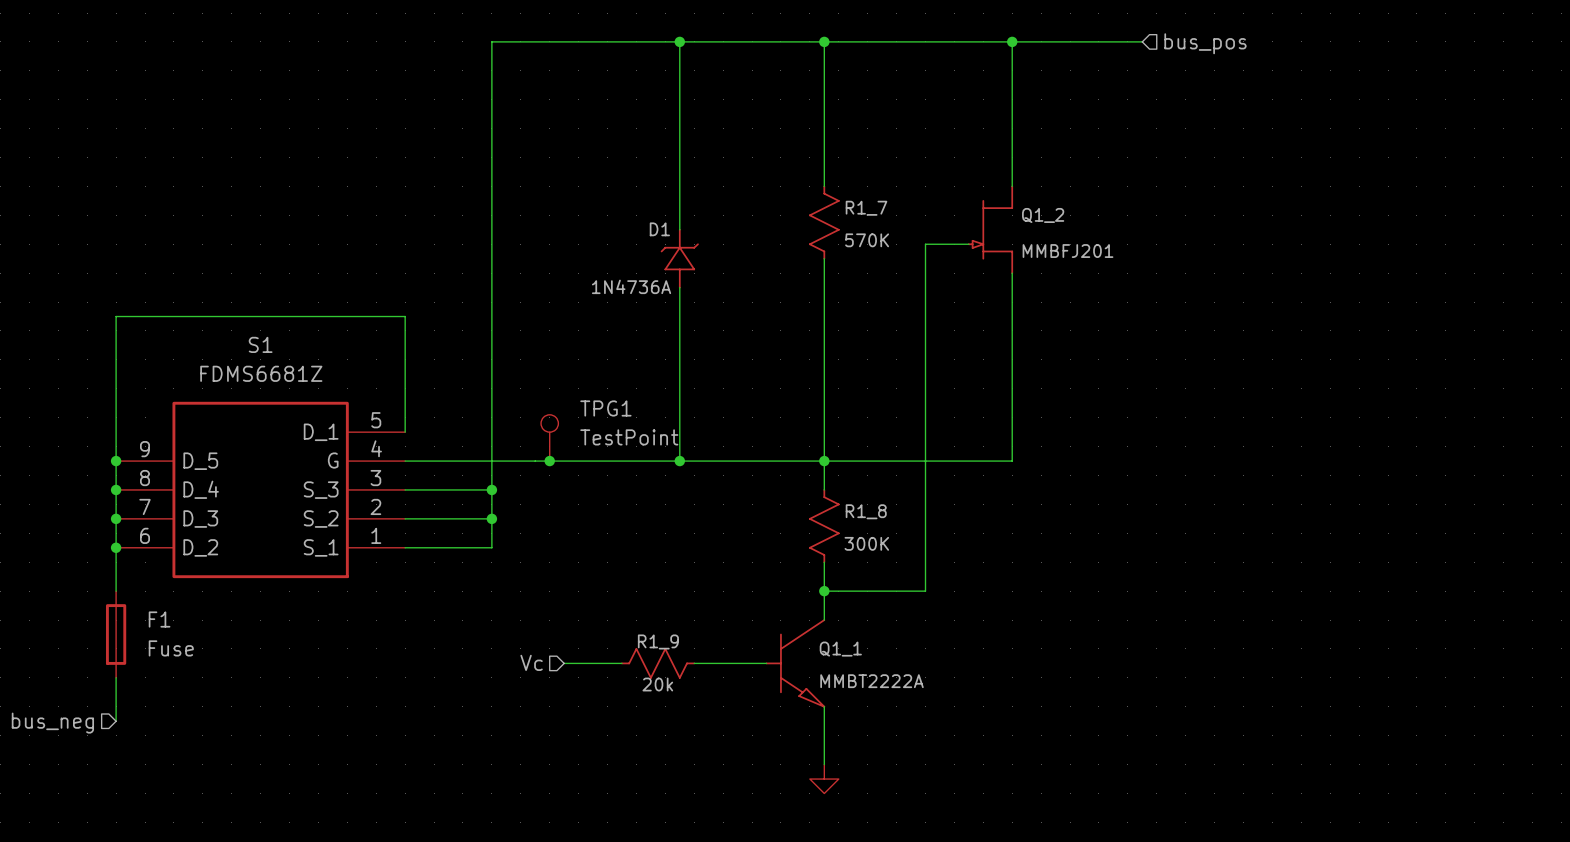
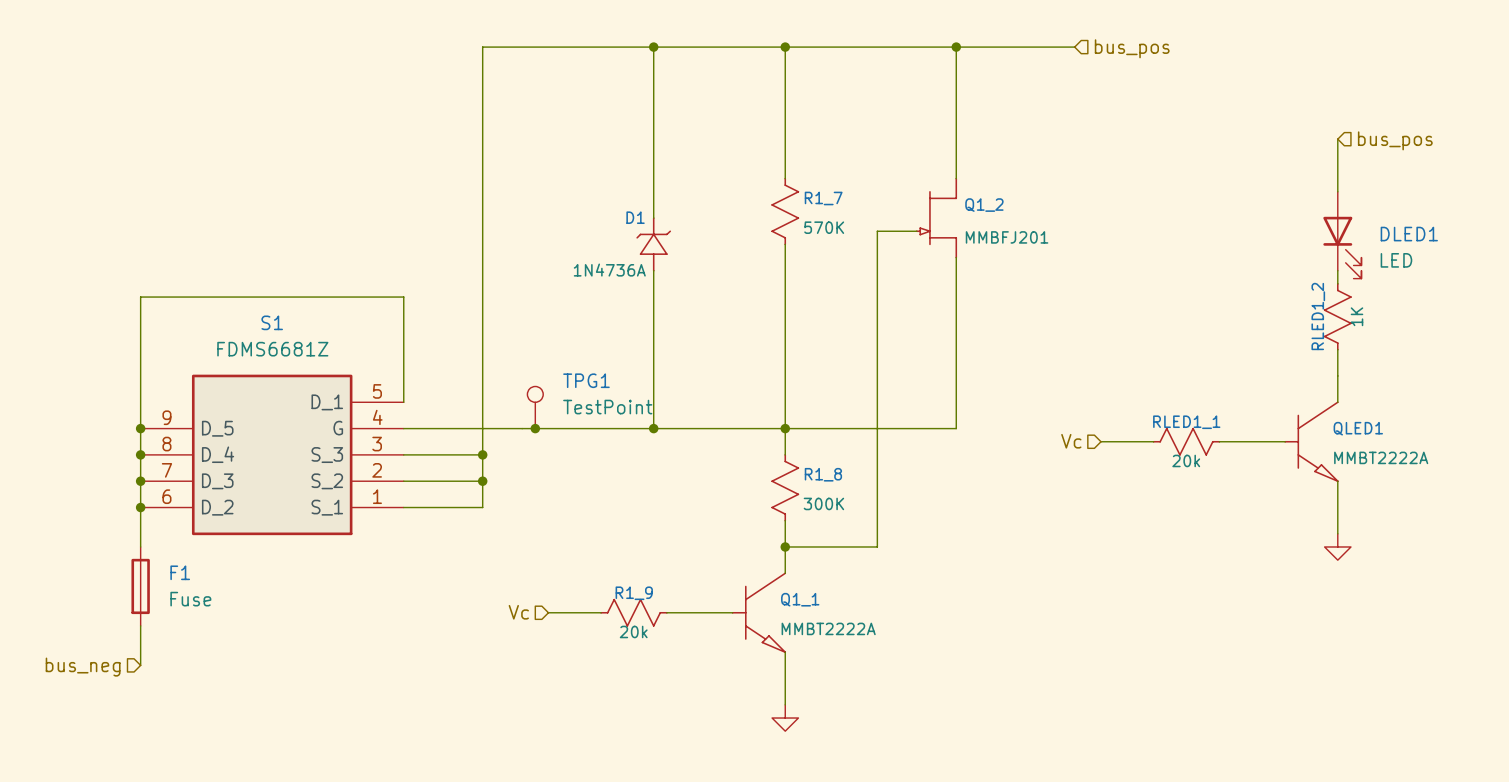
wire: none -> (1337, 139) (1337, 191)
hierarchical label: none -> bus_pos (1395, 140)
DLED1: none -> LED (1342, 235)
wire: none -> (1337, 270) (1337, 283)
RLED1_2: none -> 1K (1337, 316)
wire: none -> (1337, 349) (1337, 402)
hierarchical label: none -> Vc (1071, 441)
wire: none -> (1100, 441) (1153, 441)
RLED1_1: none -> 20k (1186, 441)
wire: none -> (1219, 441) (1285, 441)
QLED1: none -> MMBT2222A (1311, 441)
wire: none -> (1337, 481) (1337, 533)
power symbol: none -> (1337, 546)

